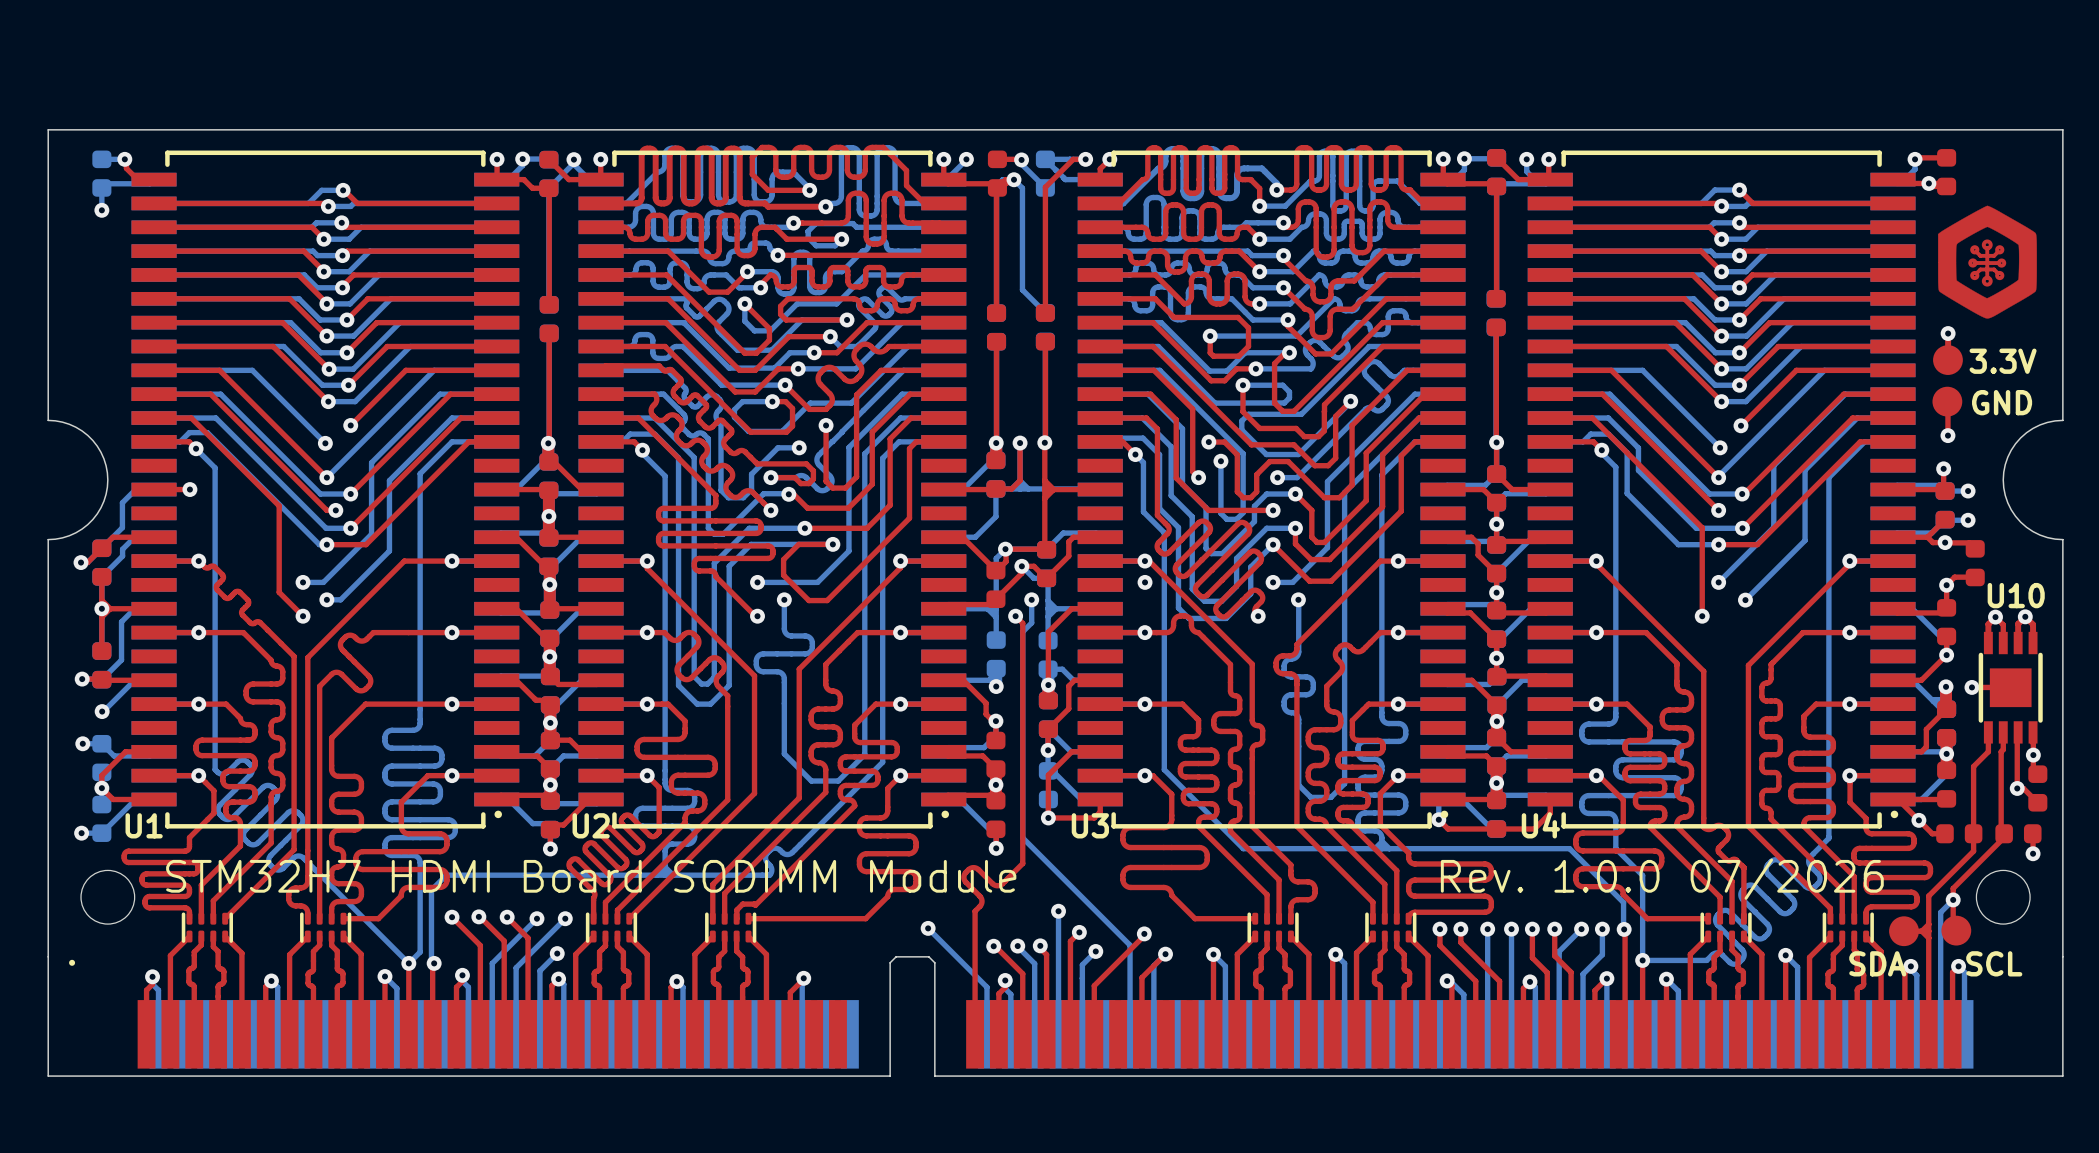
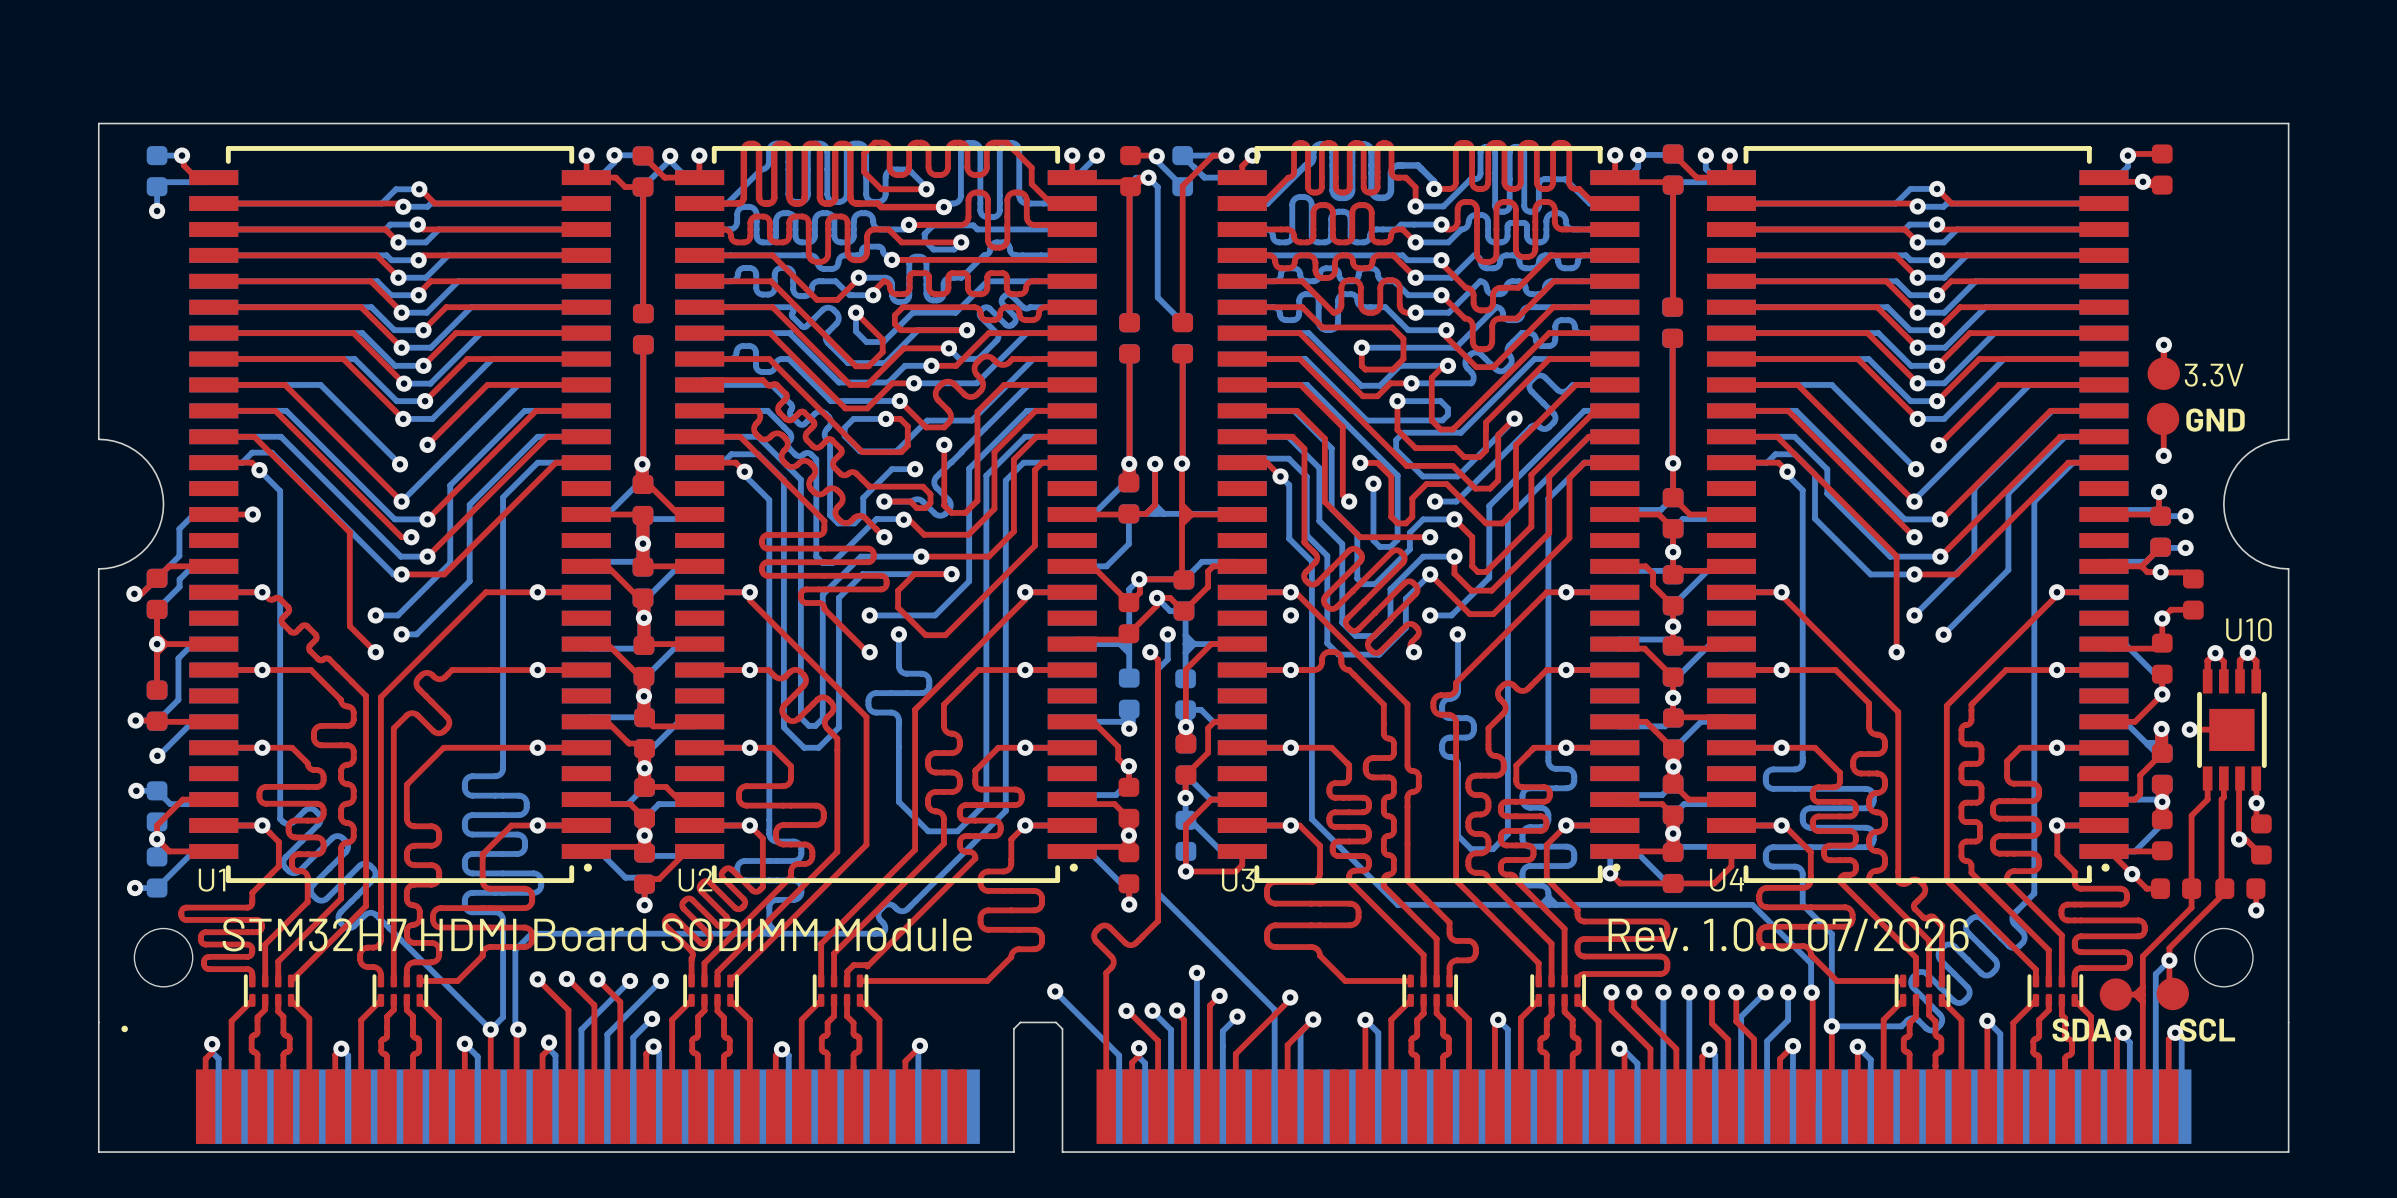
drawing: [1938, 205, 2037, 319] -> none

